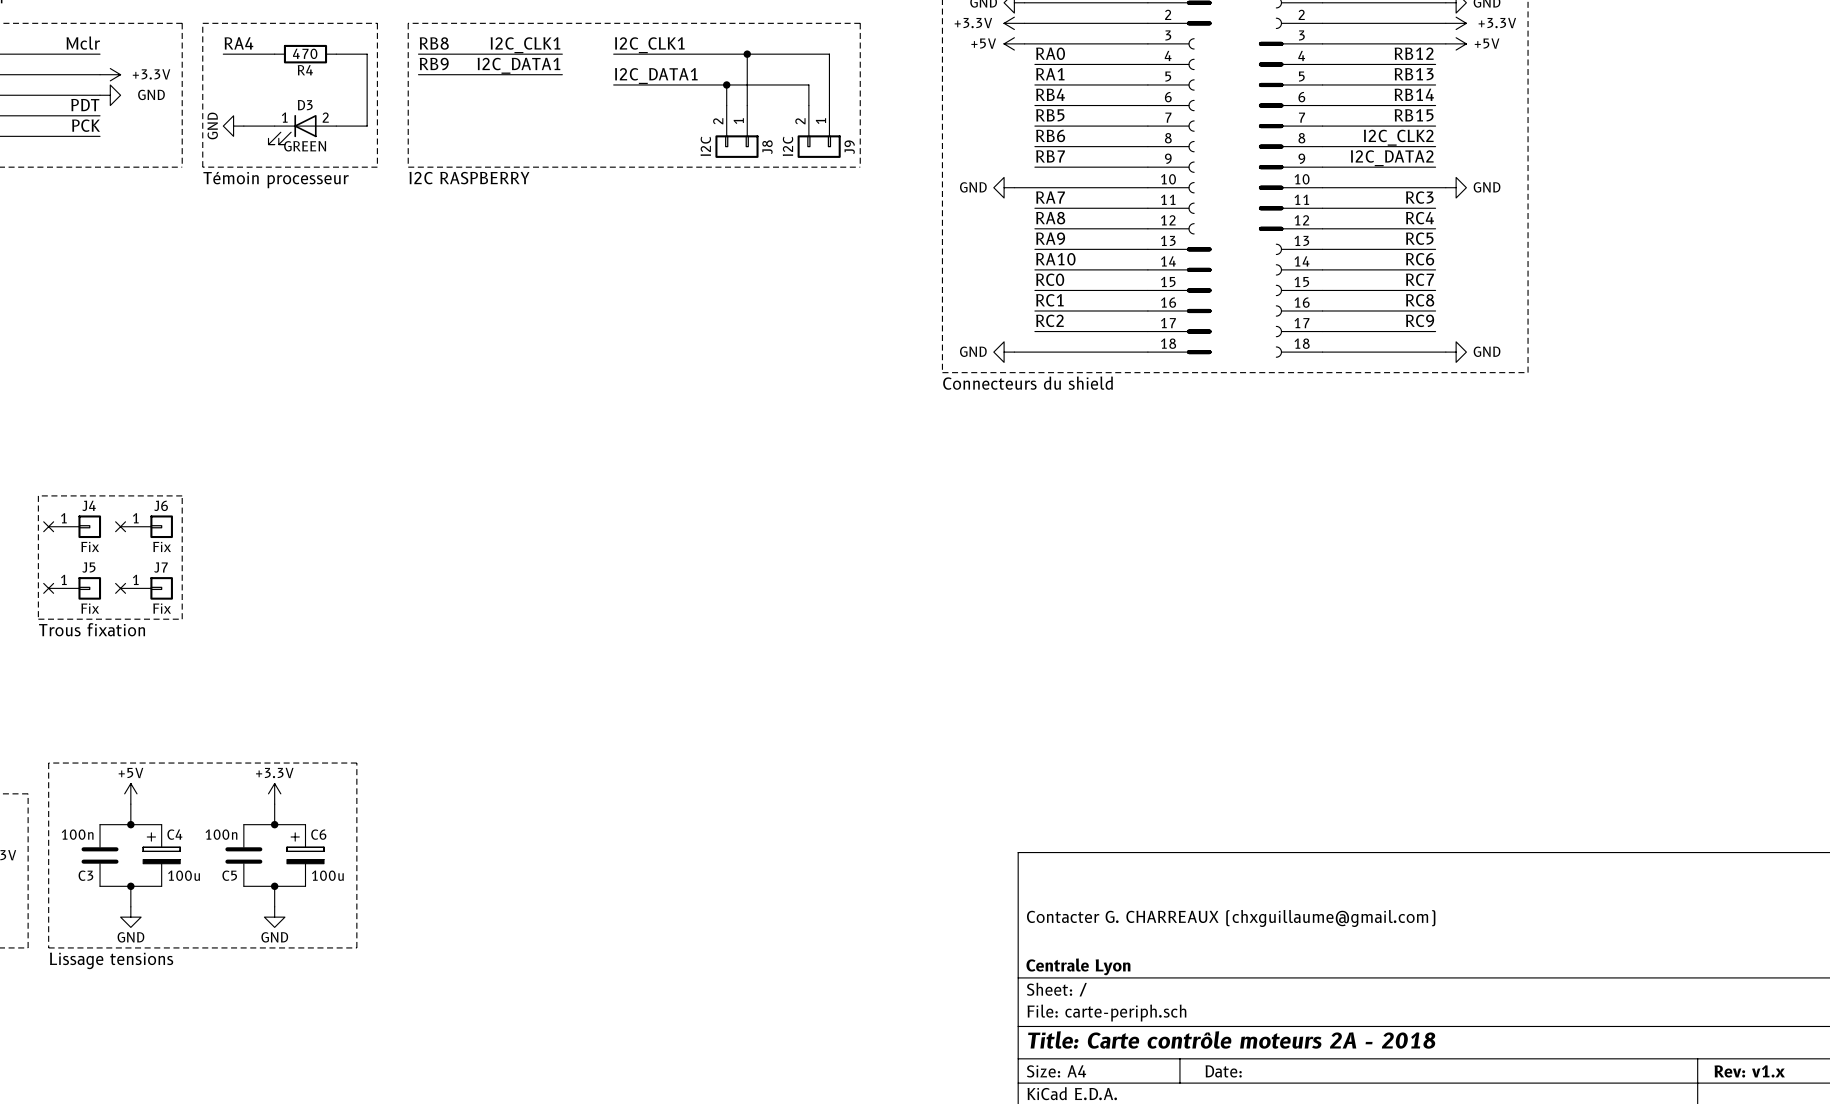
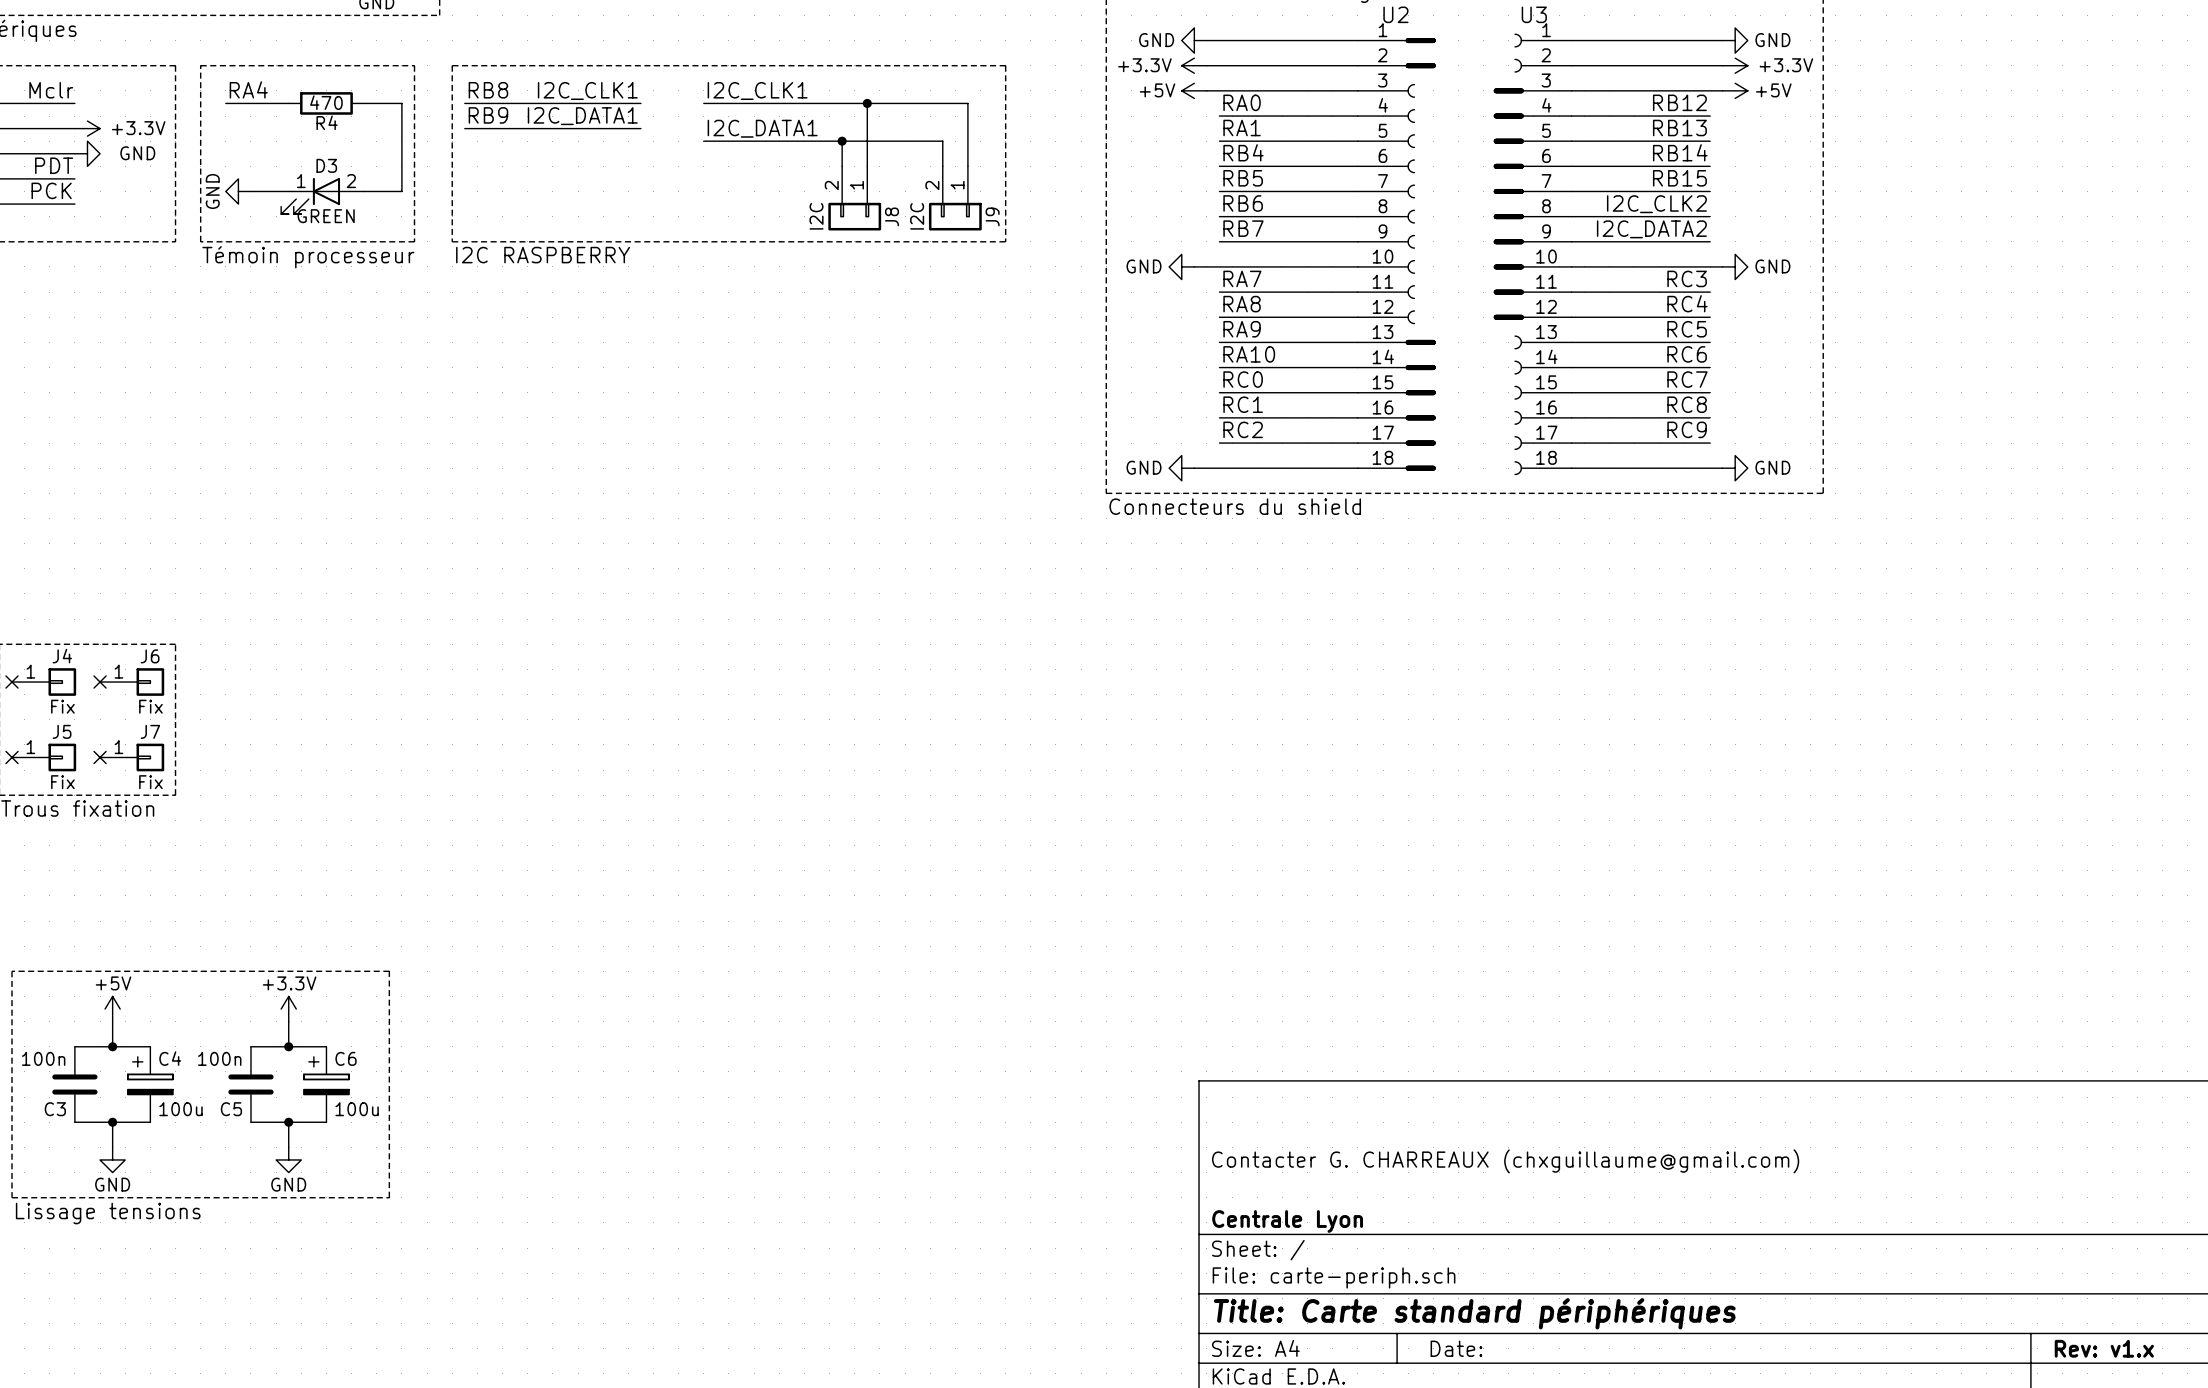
title block: Title: Carte contrôle moteurs 2A - 2018 (1231, 1039) -> Title: Carte standard périphériques (1474, 1313)

